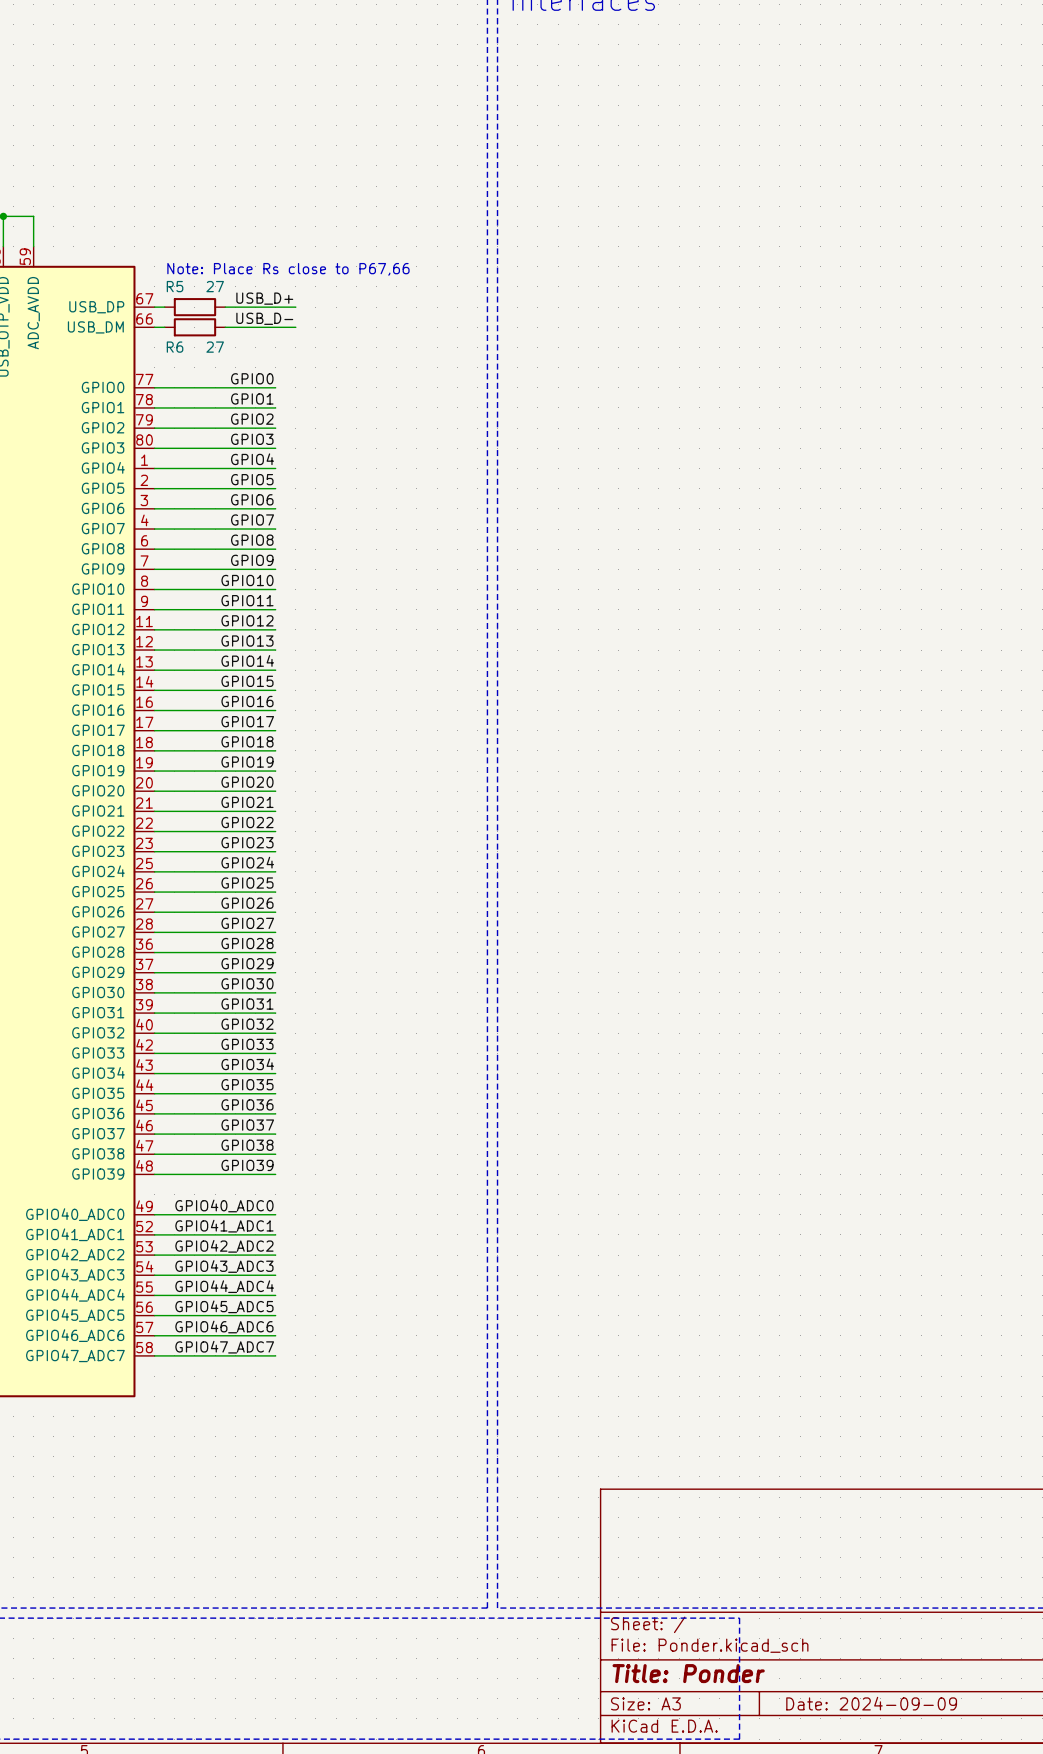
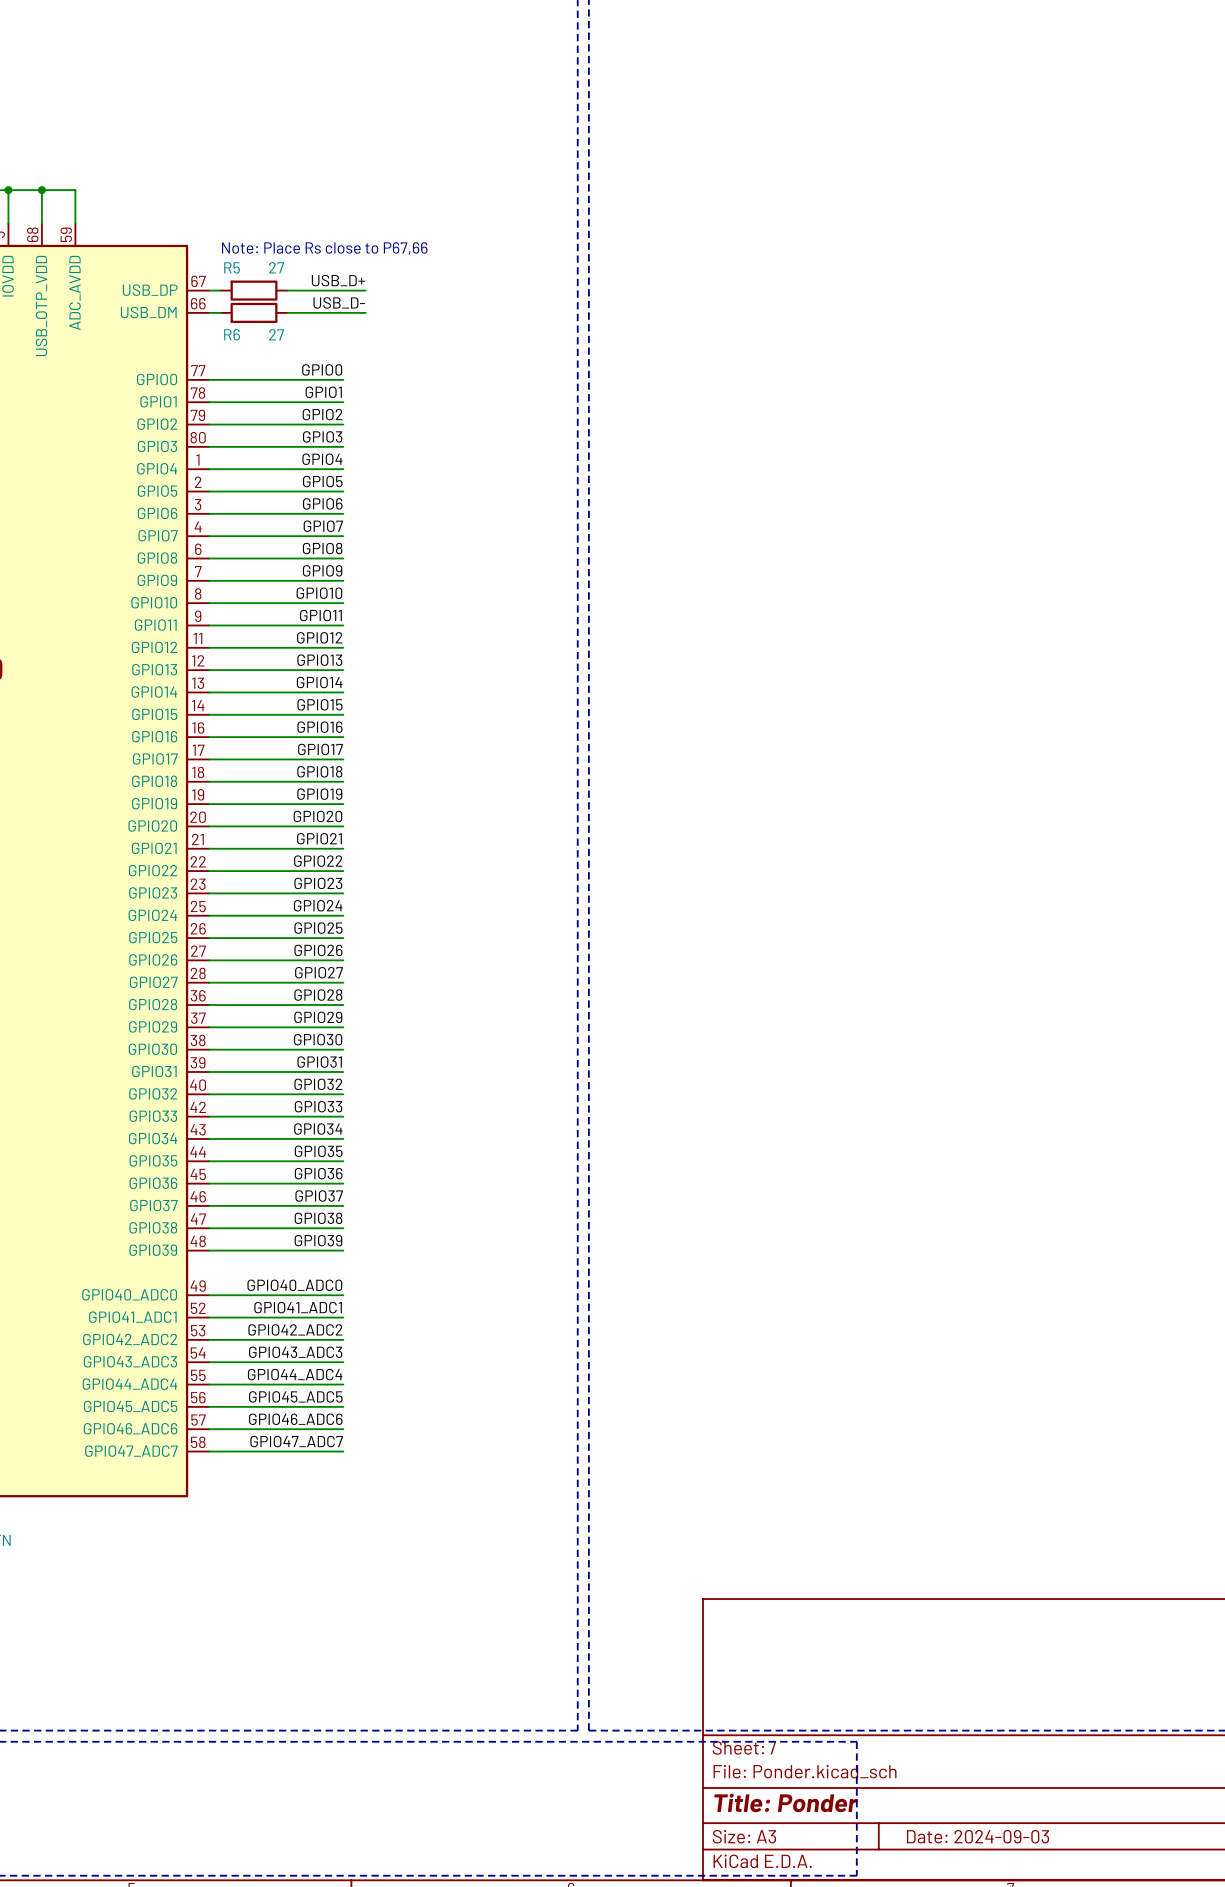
title block: Date: 2024-09-09 (871, 1703) -> Date: 2024-09-03 (978, 1836)

